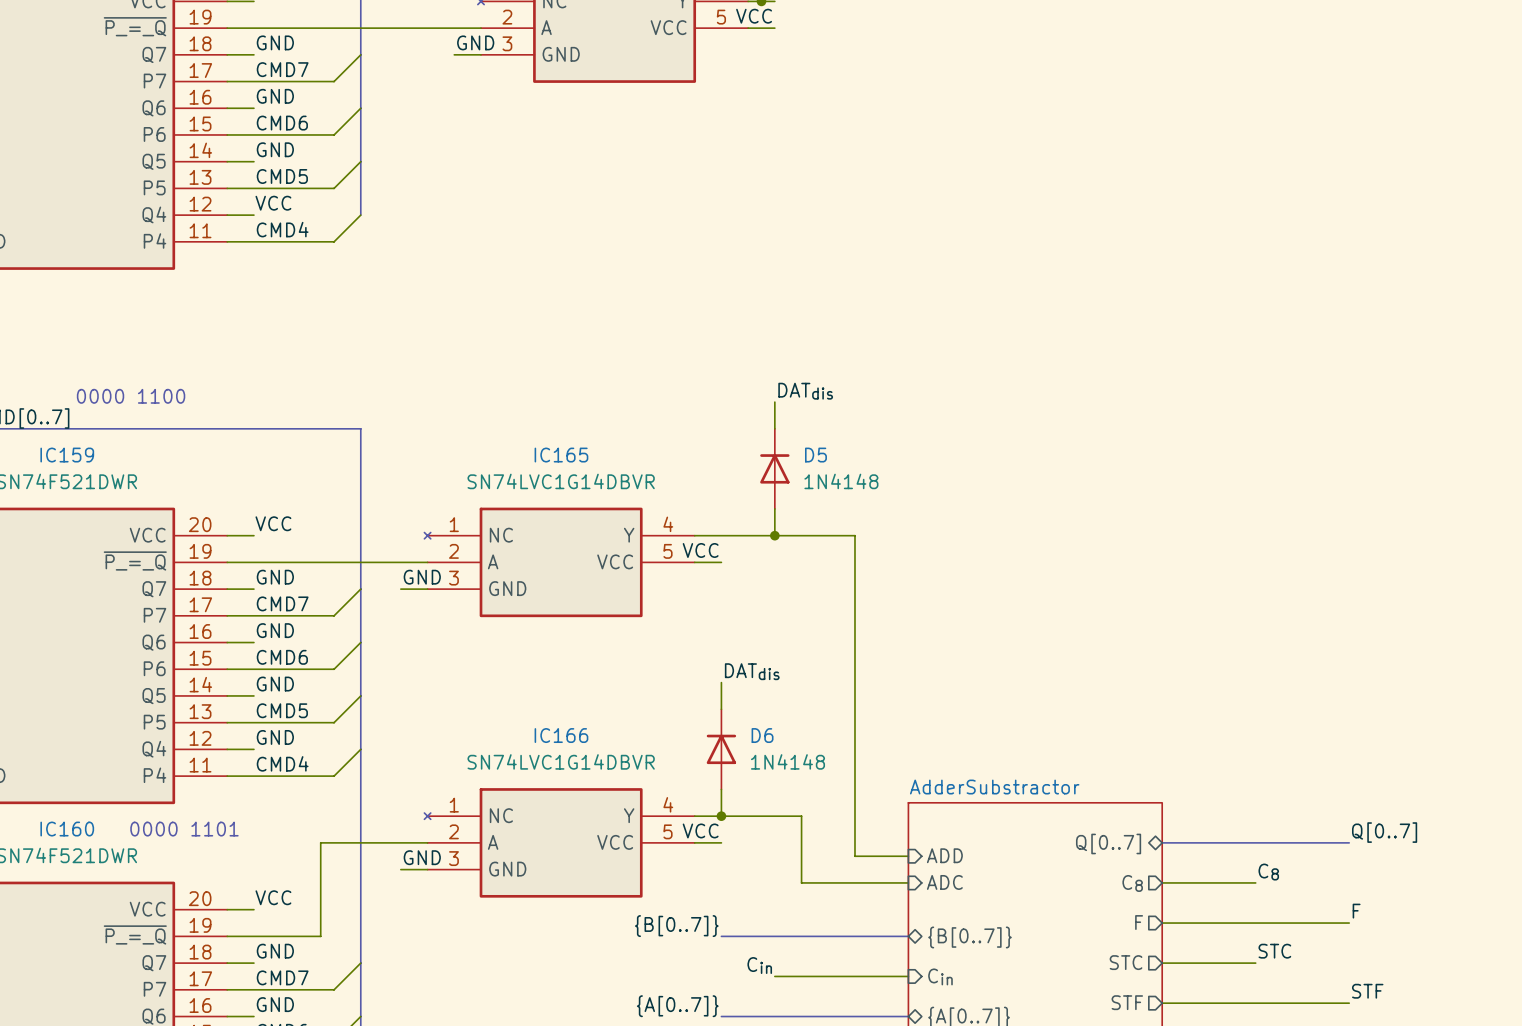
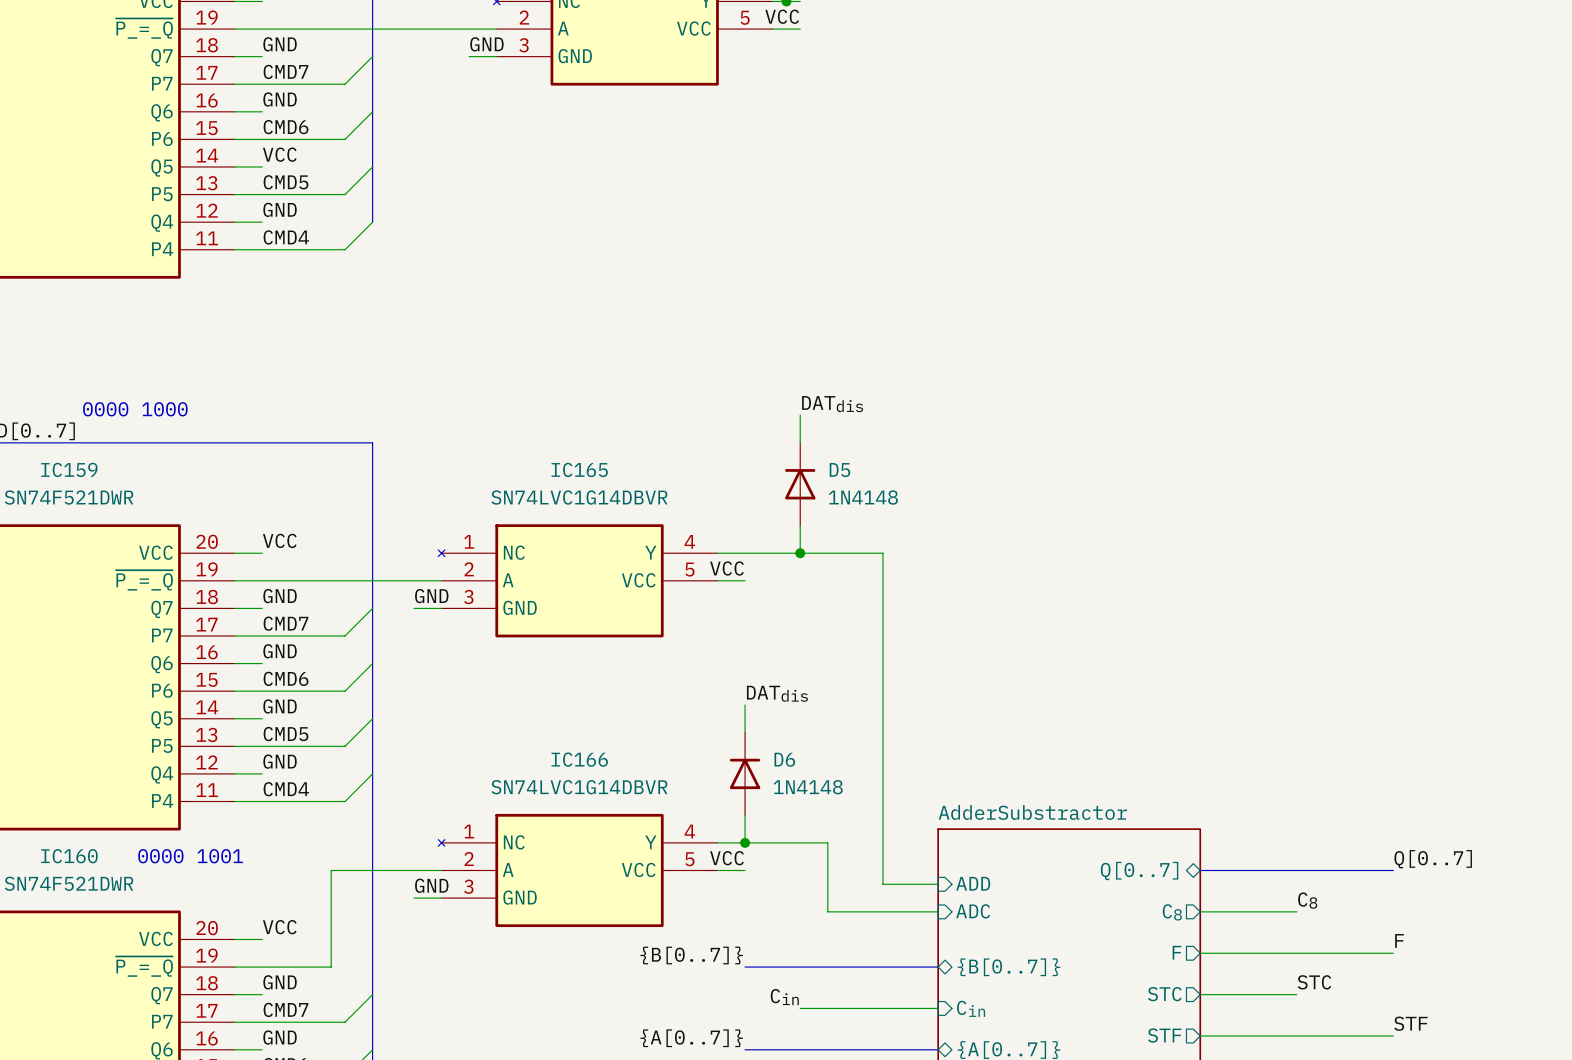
label: GND (275, 149) -> VCC (279, 154)
label: VCC (273, 203) -> GND (280, 209)
text: 0000 1100 (131, 396) -> 0000 1000 (135, 409)
text: 0000 1101 (184, 829) -> 0000 1001 (190, 856)

